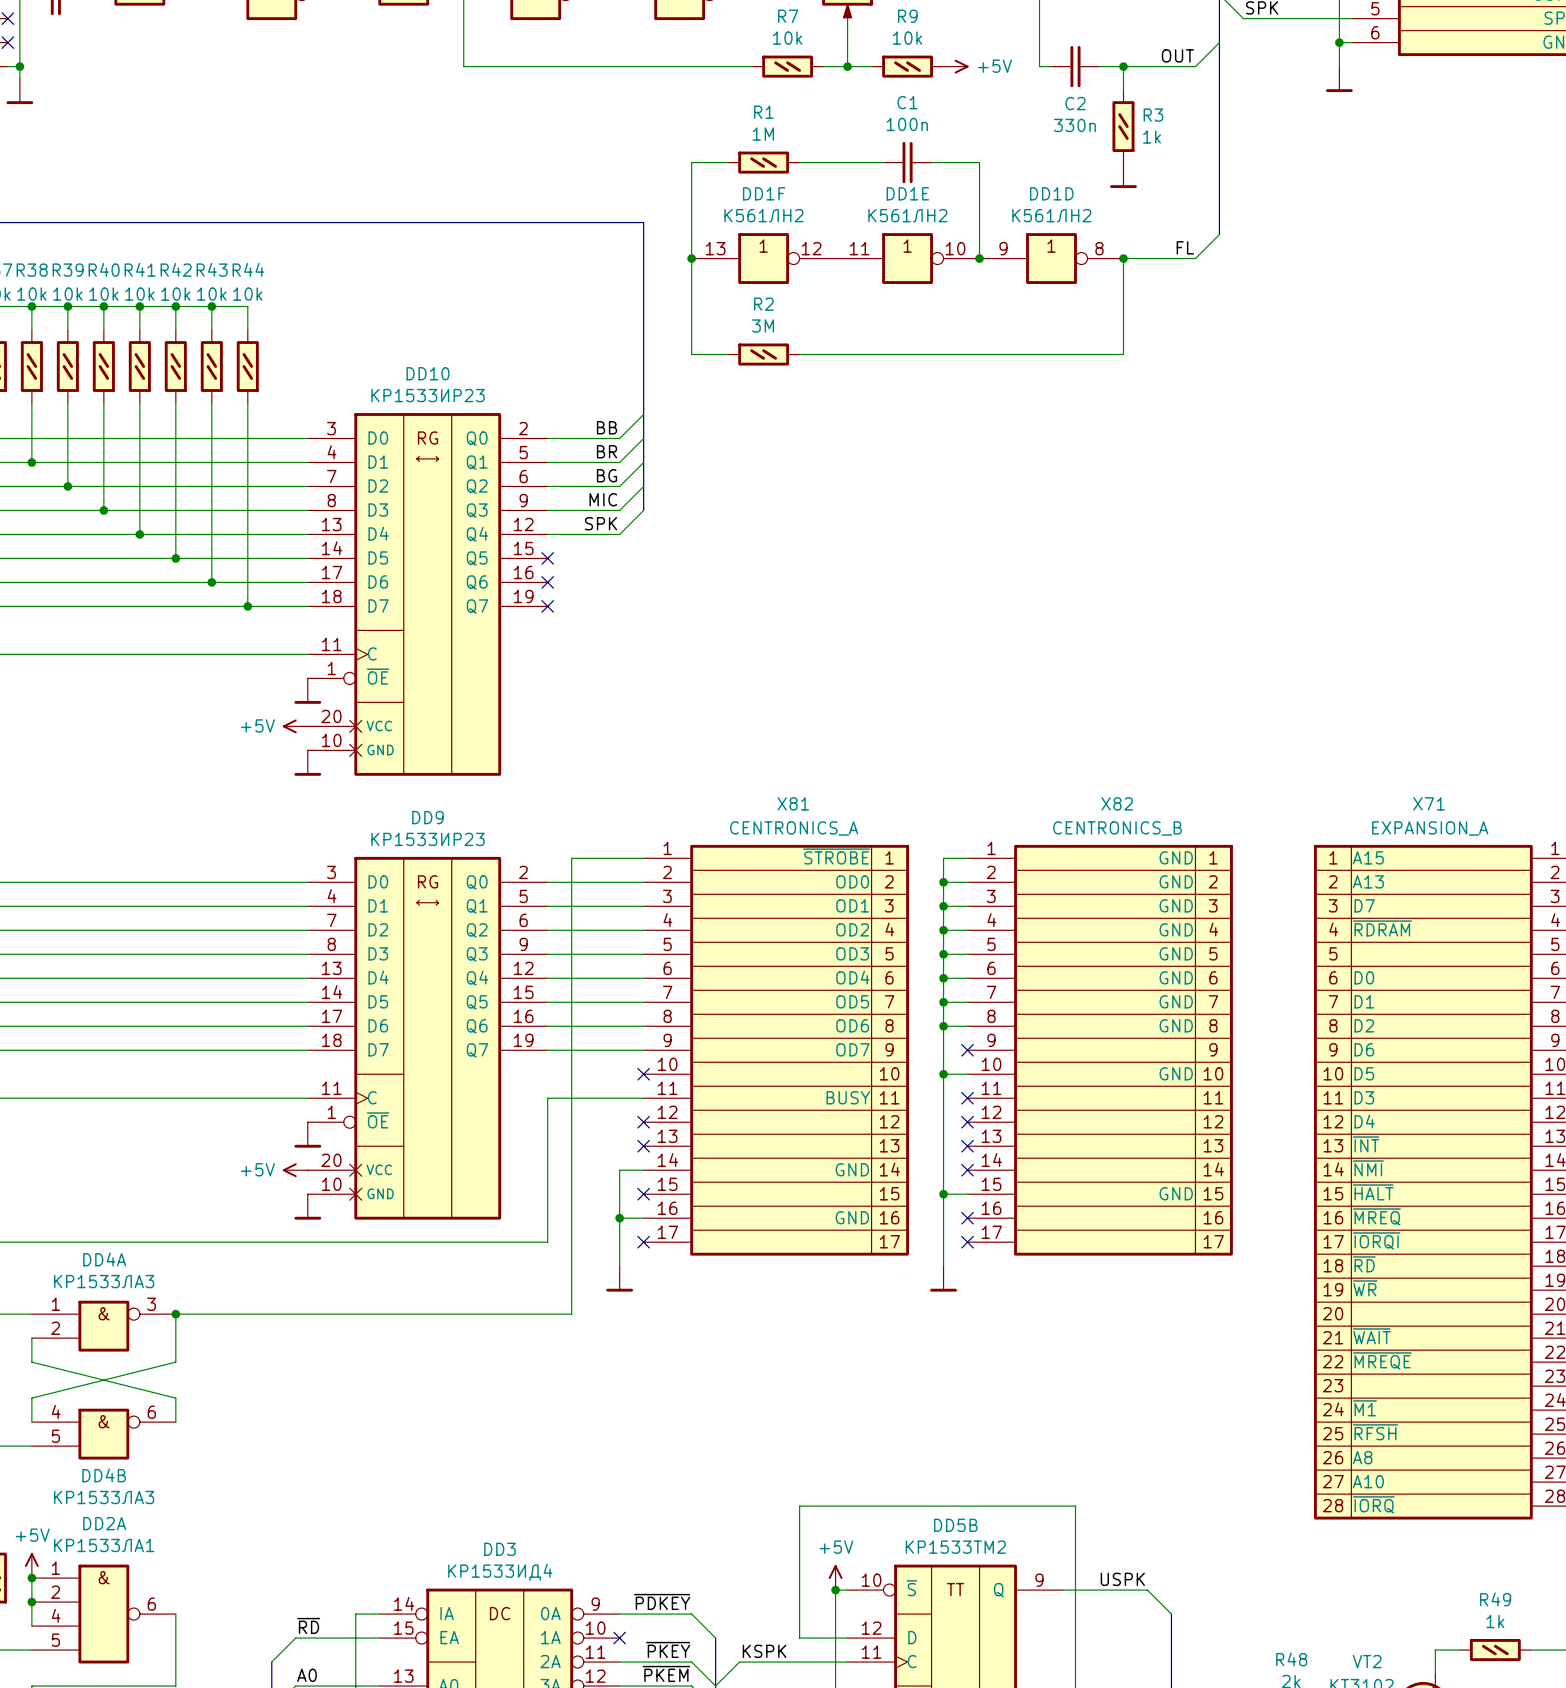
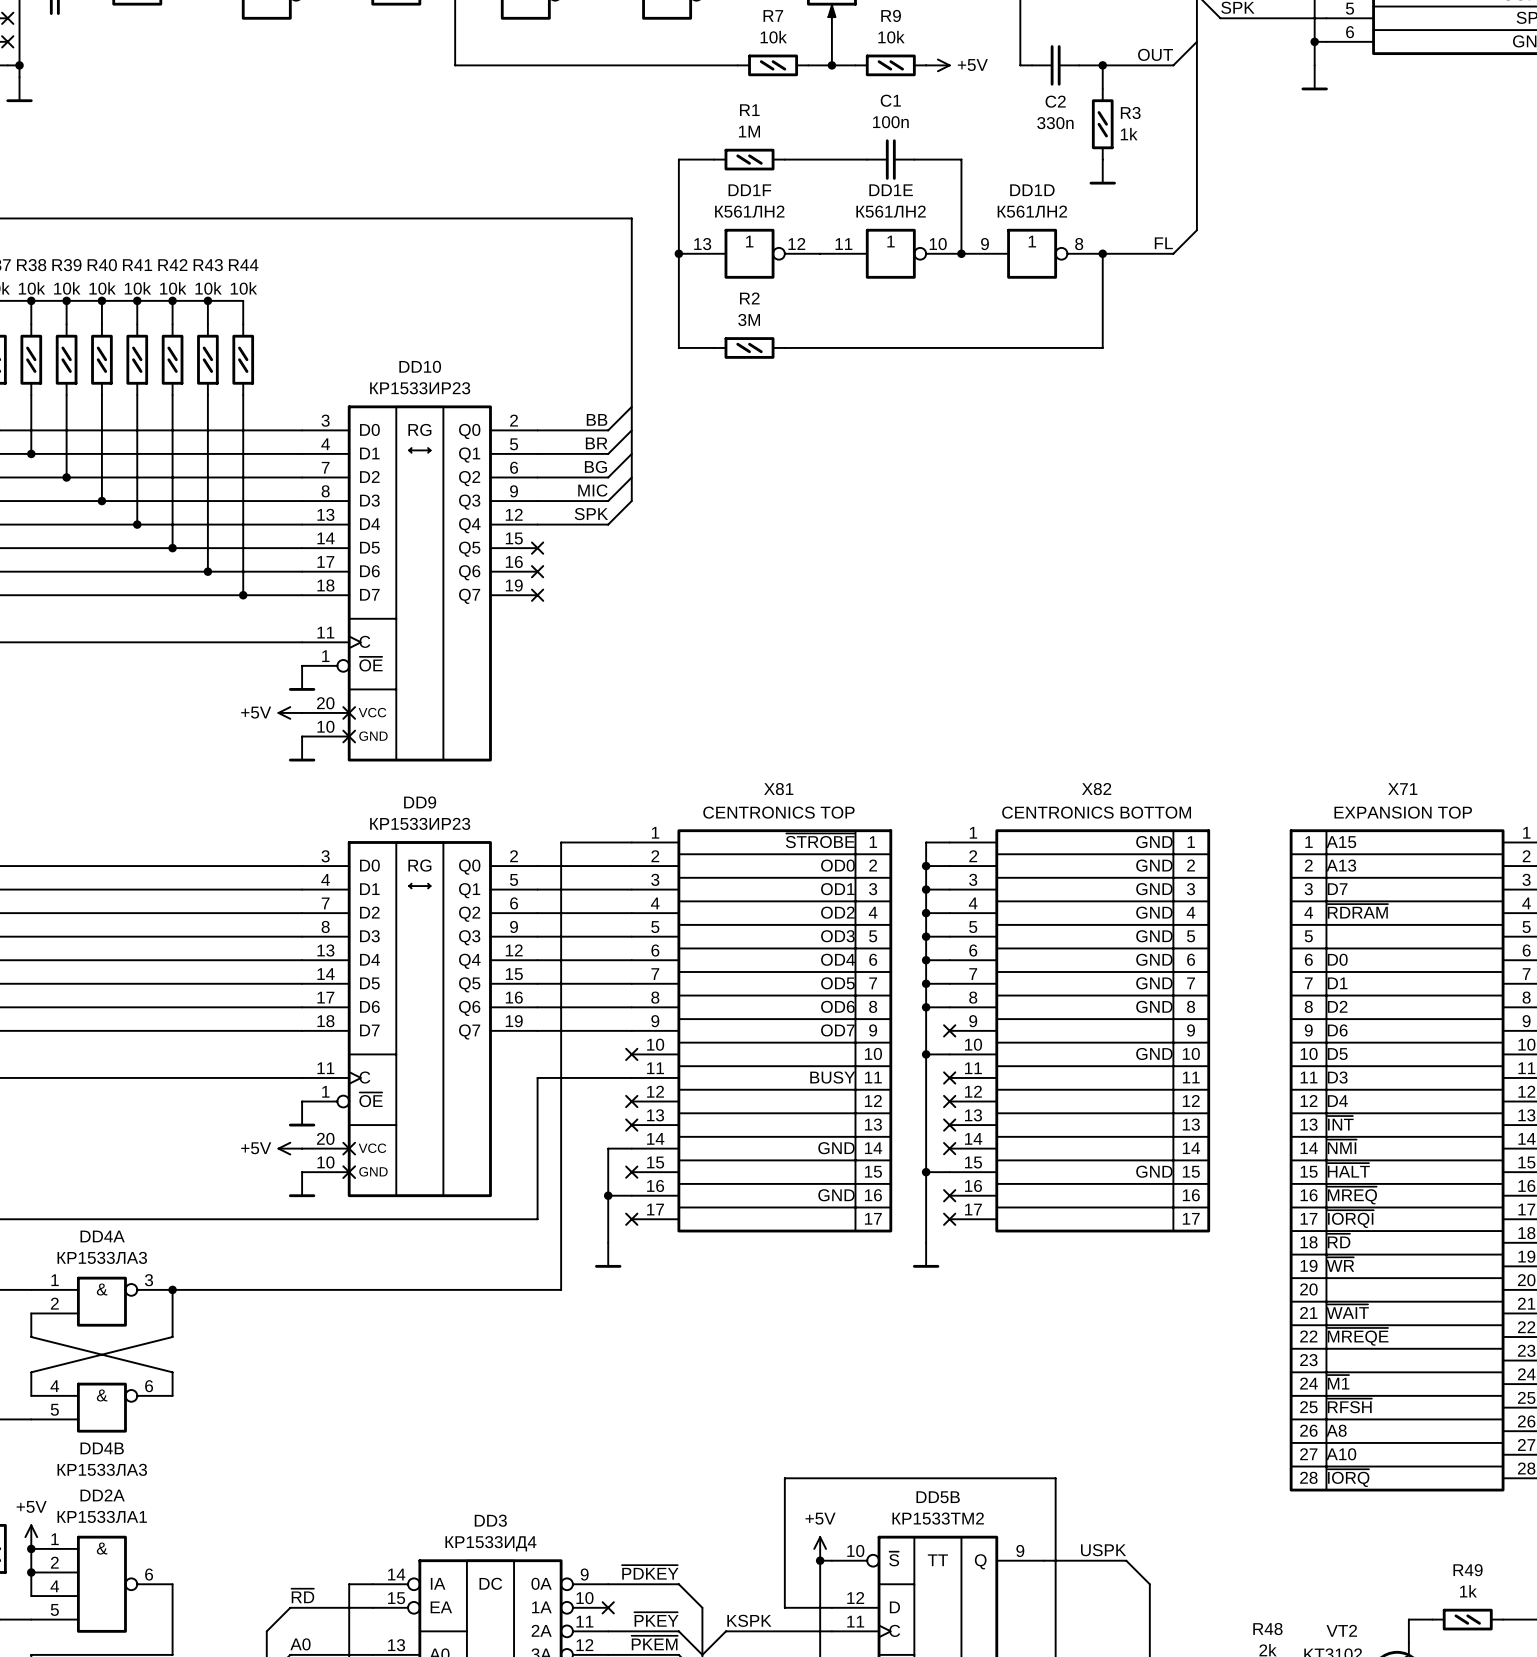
X81 value: CENTRONICS_A (794, 828) -> CENTRONICS TOP (778, 812)
X82 value: CENTRONICS_B (1117, 828) -> CENTRONICS BOTTOM (1096, 812)
X71 value: EXPANSION_A (1430, 828) -> EXPANSION TOP (1403, 812)

